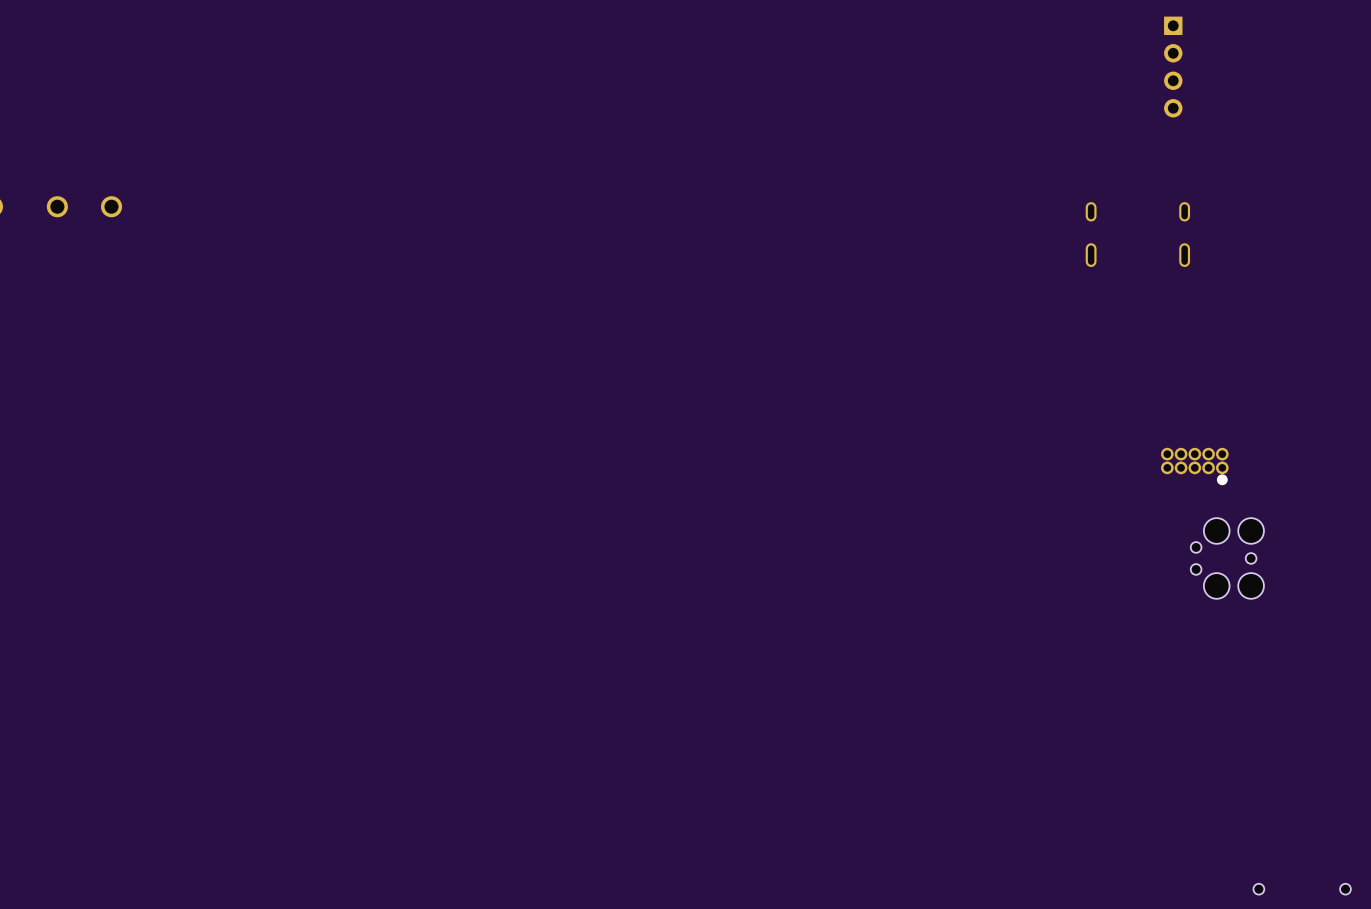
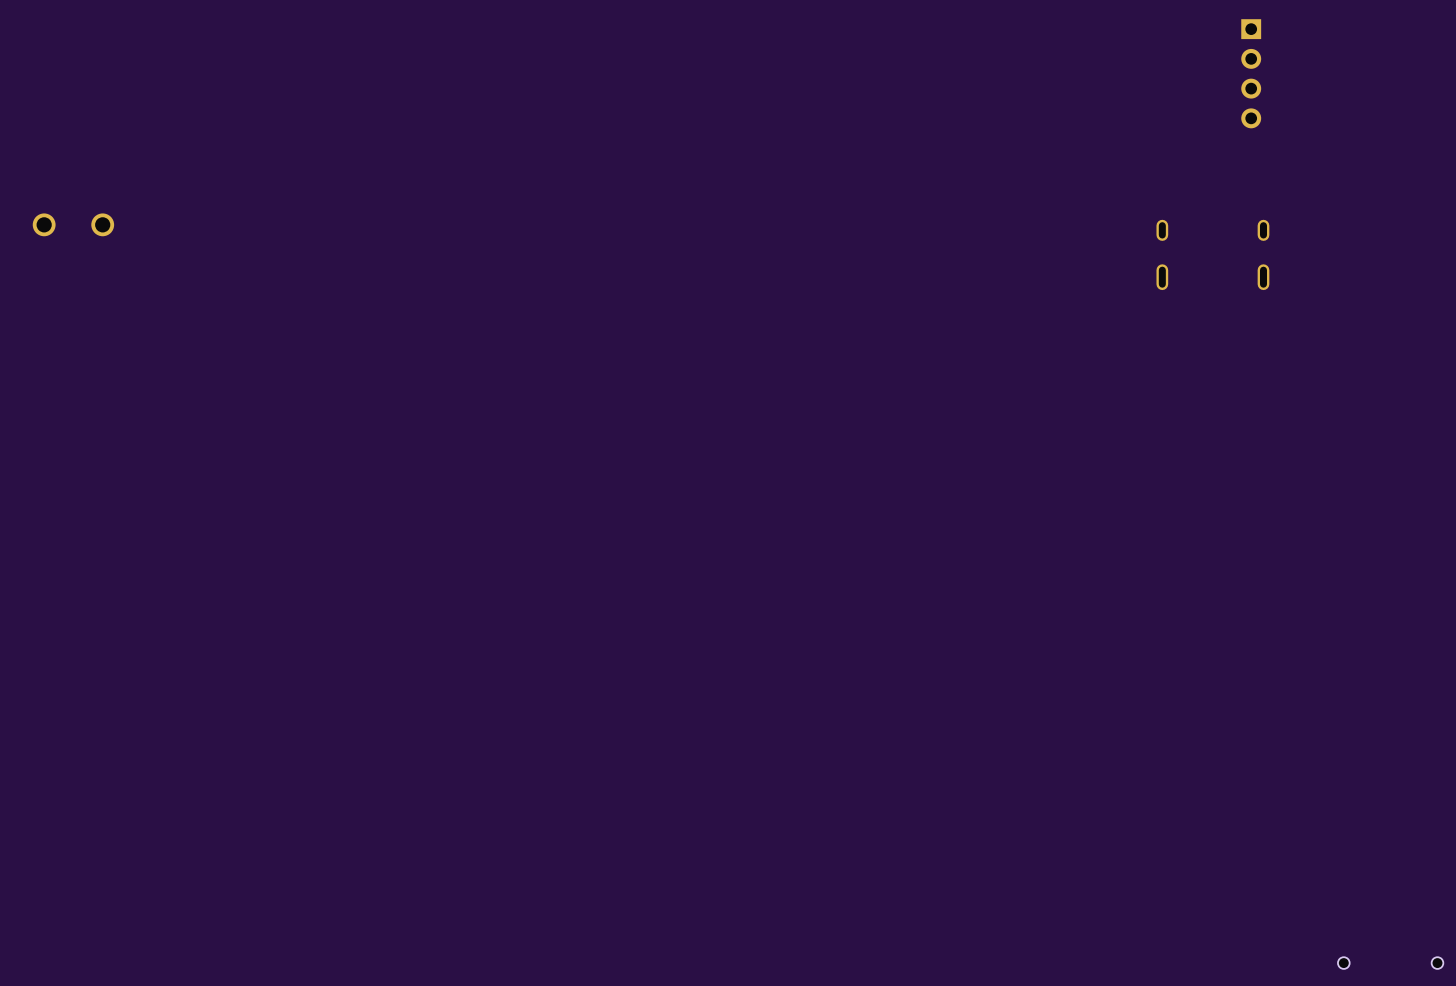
part: (1194, 466) -> none
part: (1227, 558) -> none

